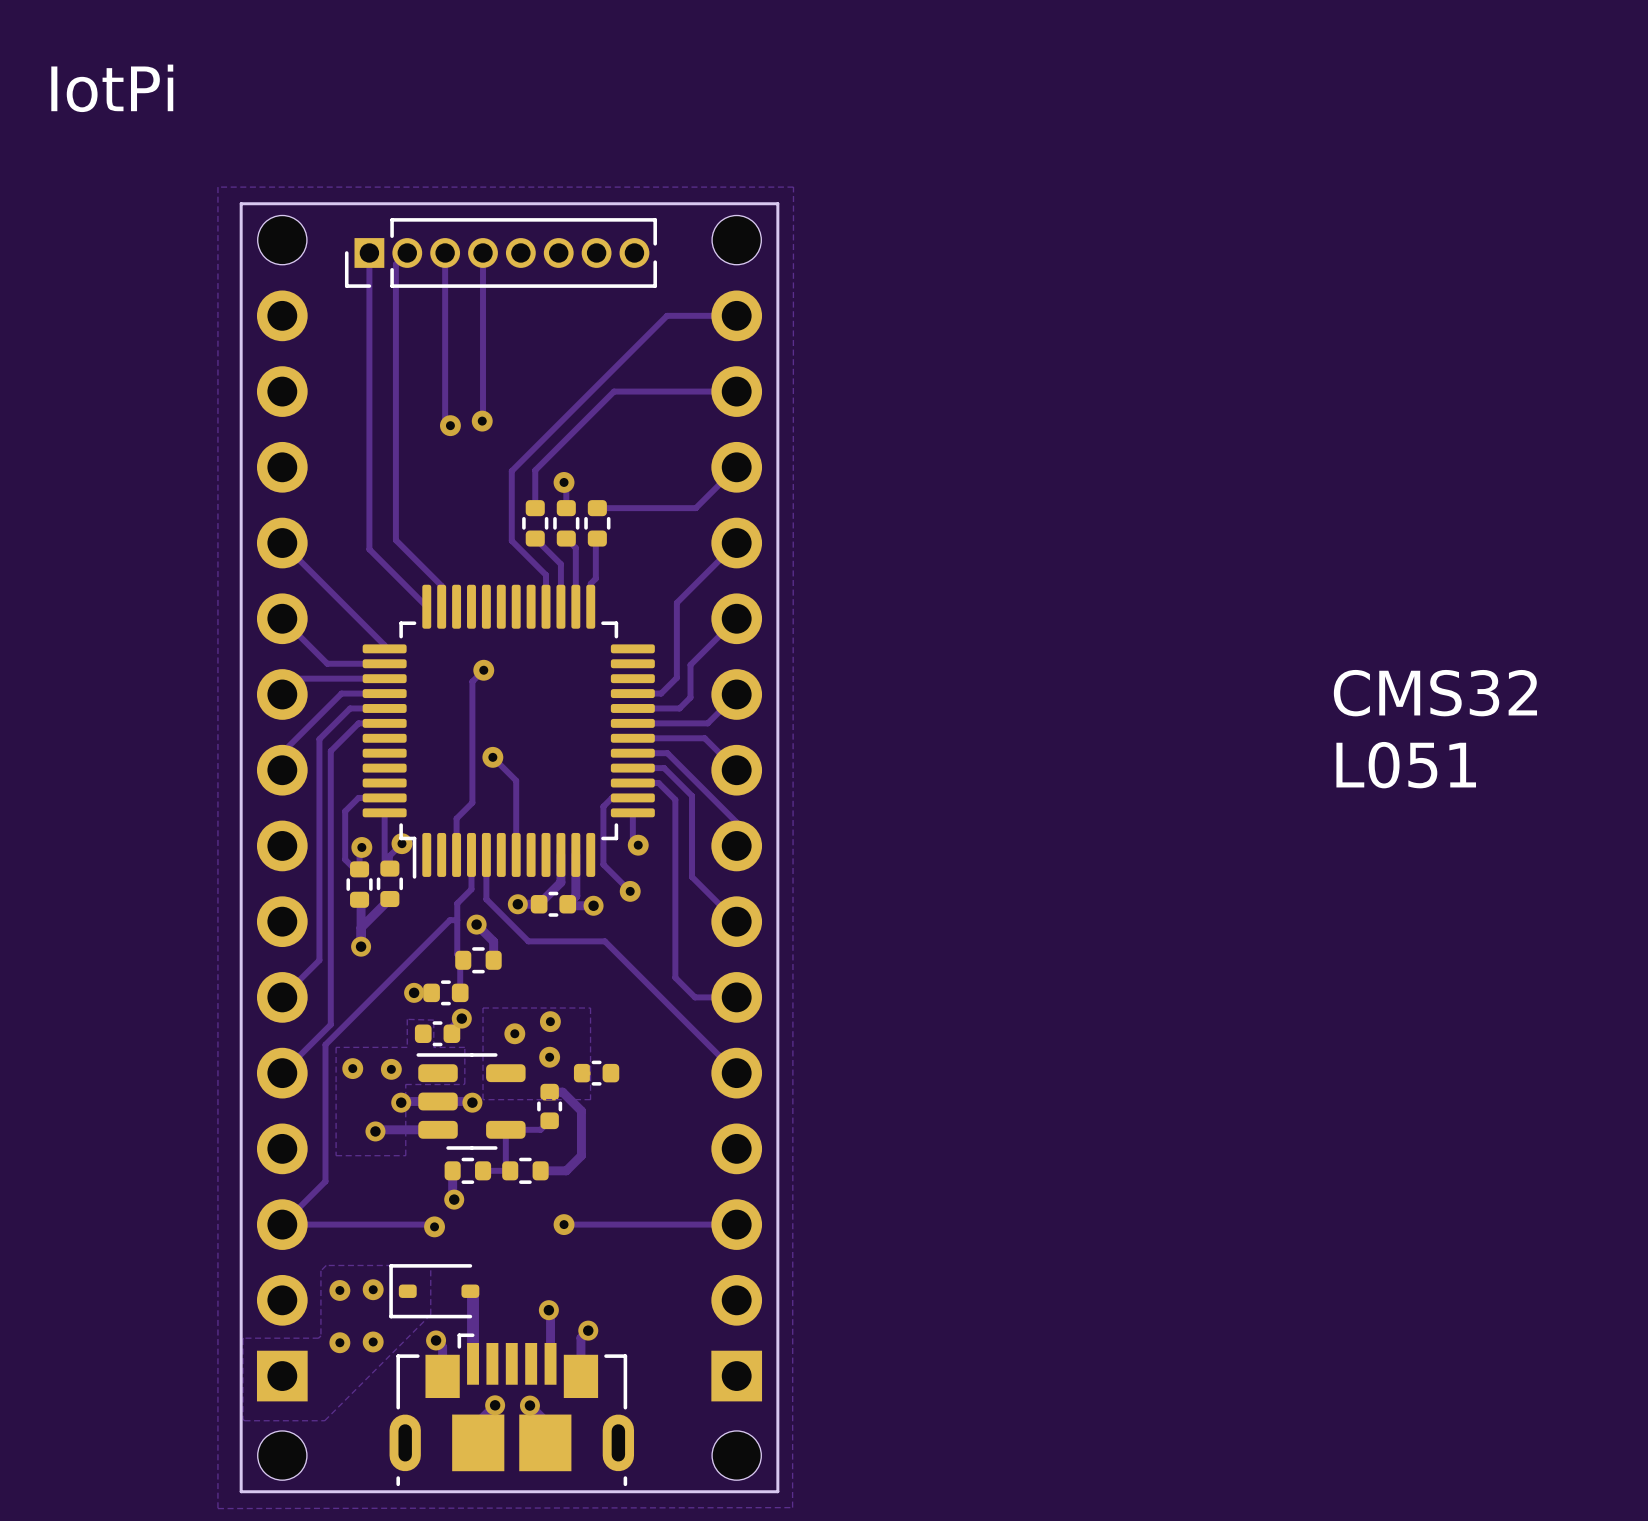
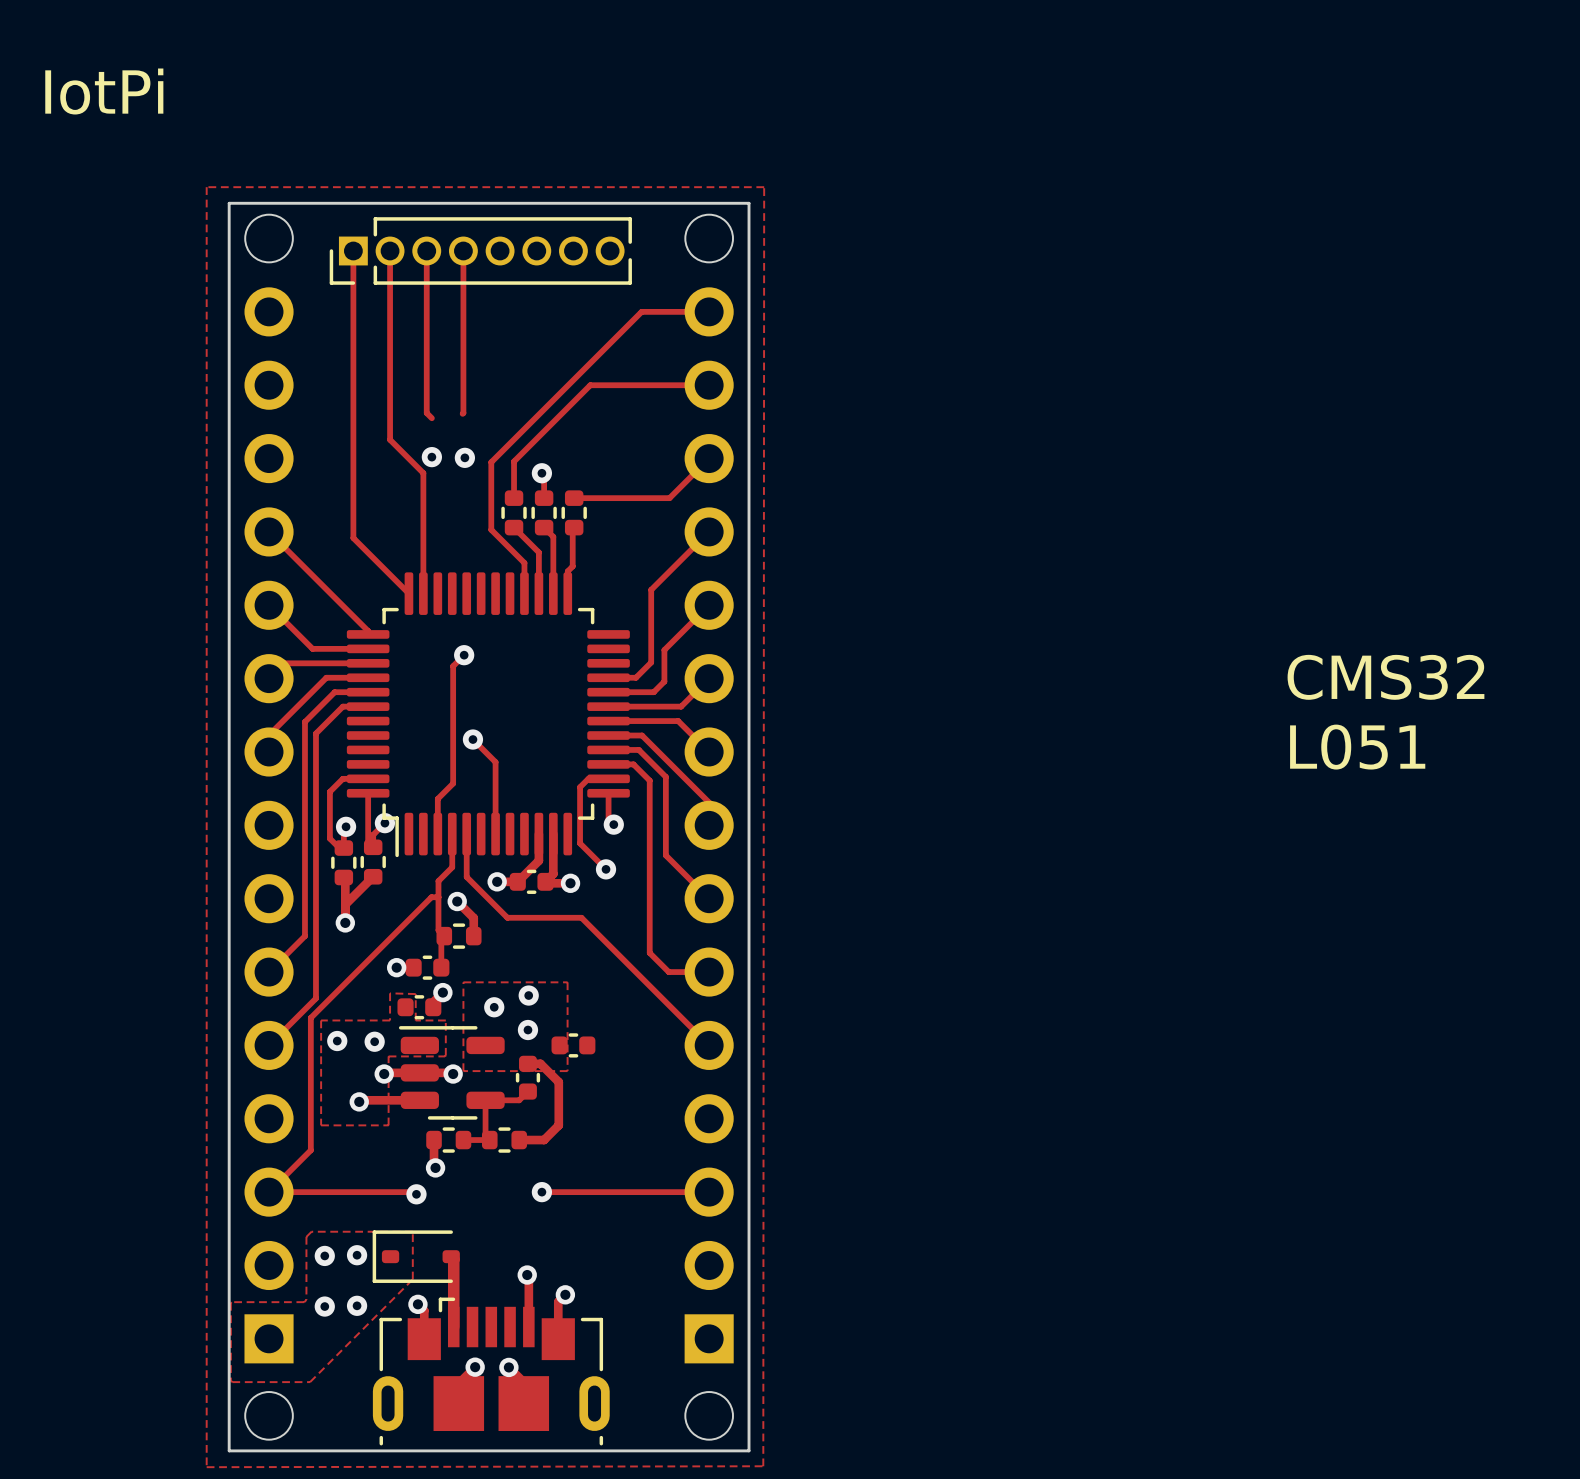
track: (407, 252) (395, 264) (395, 540) (441, 585) -> (390, 250) (390, 439) (423, 473) (423, 573)
via: (482, 421) -> none
via: (450, 425) -> none
via: none -> (431, 457)
via: none -> (464, 457)

